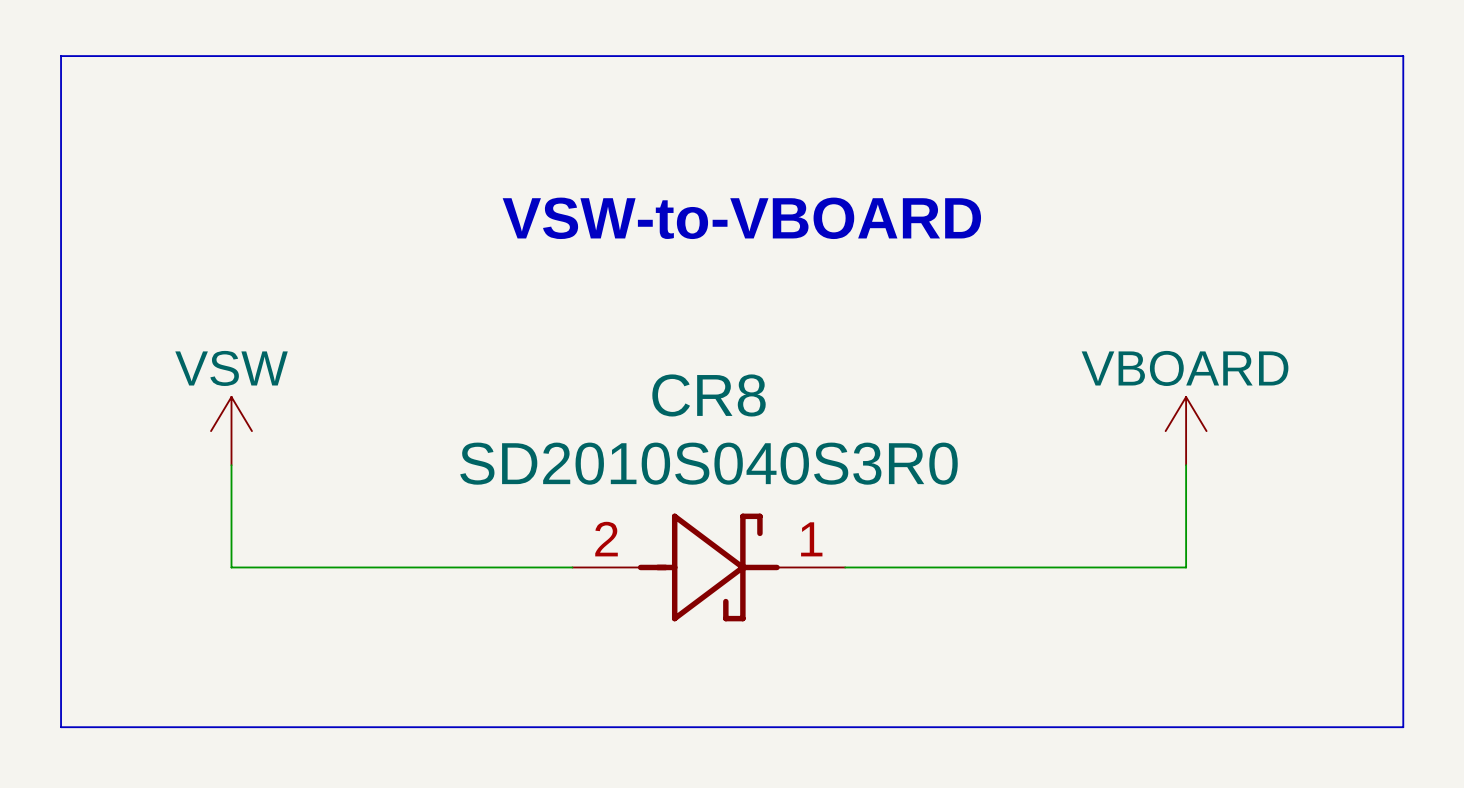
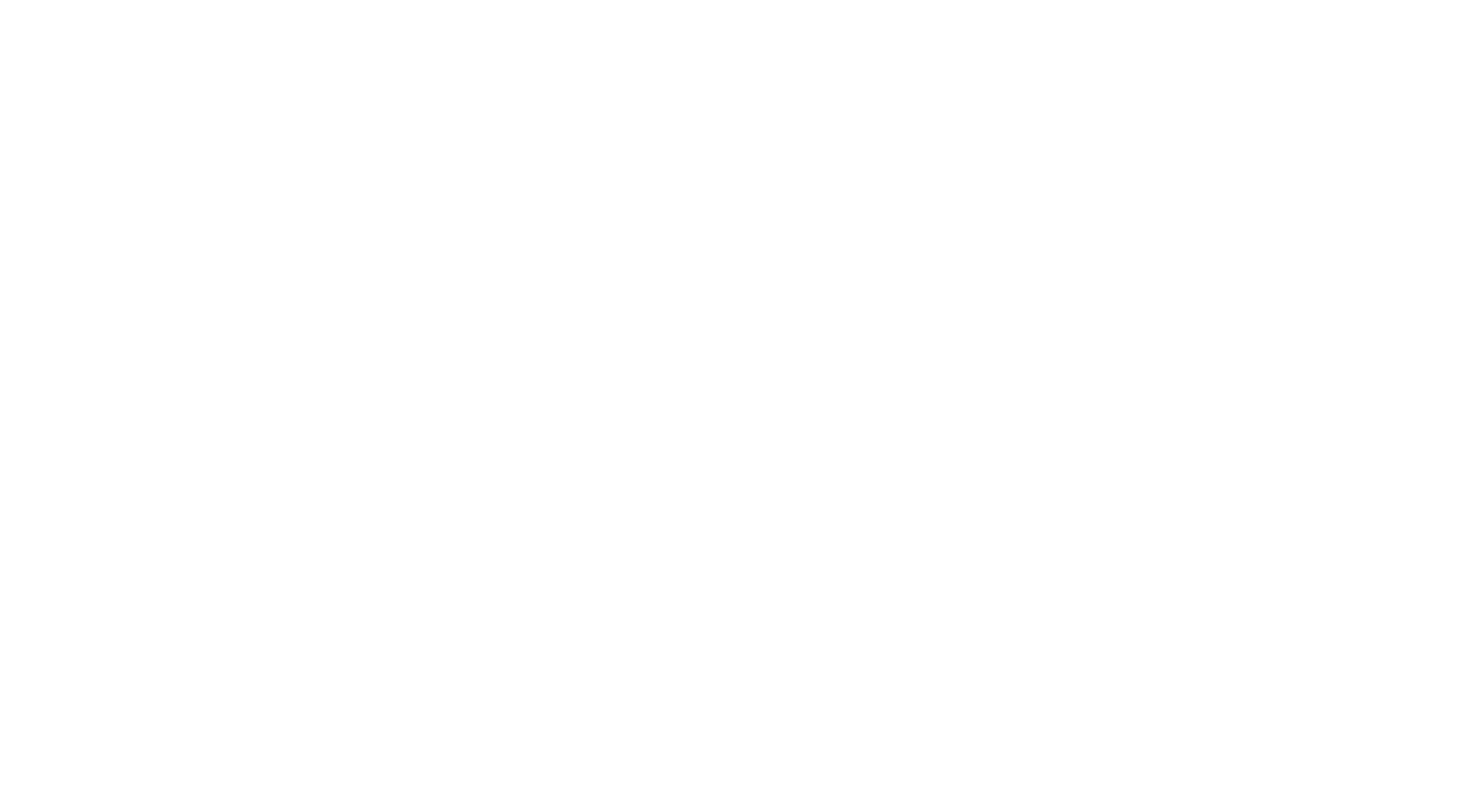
line: (61, 56) (1403, 56) (1403, 727) (61, 727) (61, 56) -> none
text: VSW-to-VBOARD (741, 218) -> none
power symbol: VSW (231, 431) -> none
power symbol: VBOARD (1186, 431) -> none
wire: (231, 465) (231, 567) (572, 567) -> none
wire: (1186, 465) (1186, 567) (845, 567) -> none
CR8: SD2010S040S3R0 (708, 567) -> none

